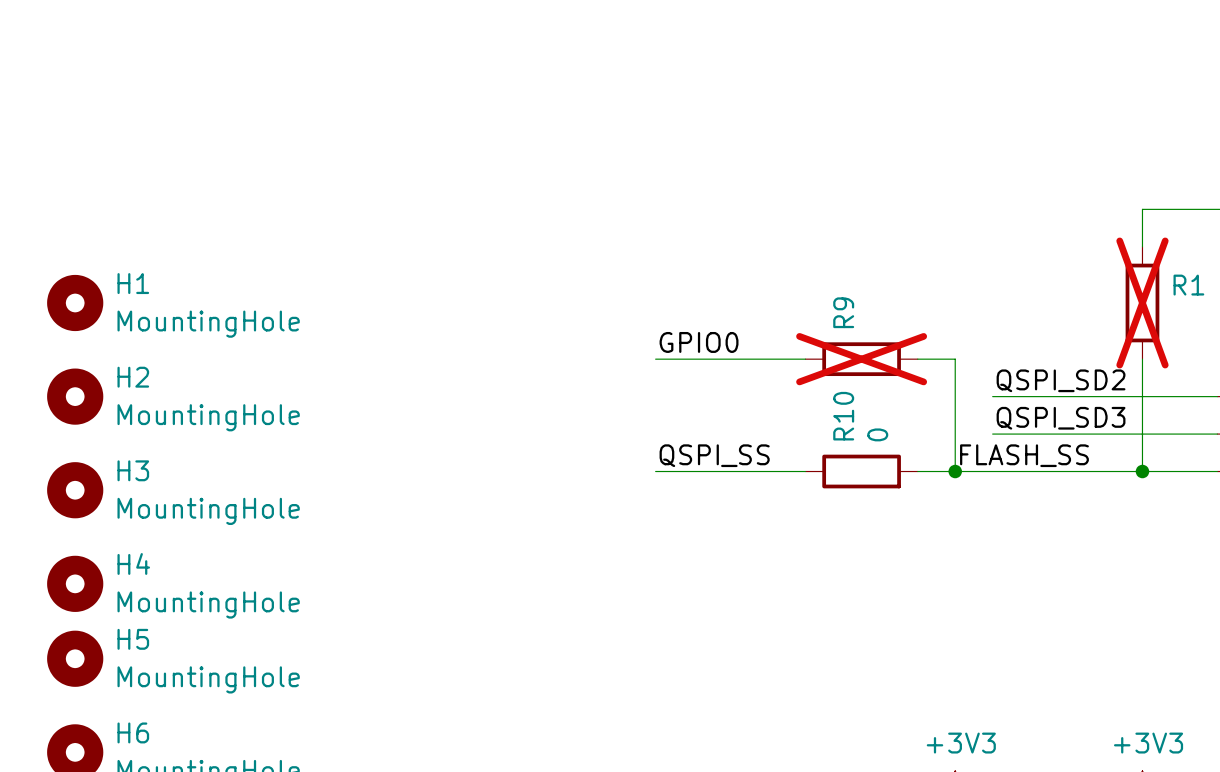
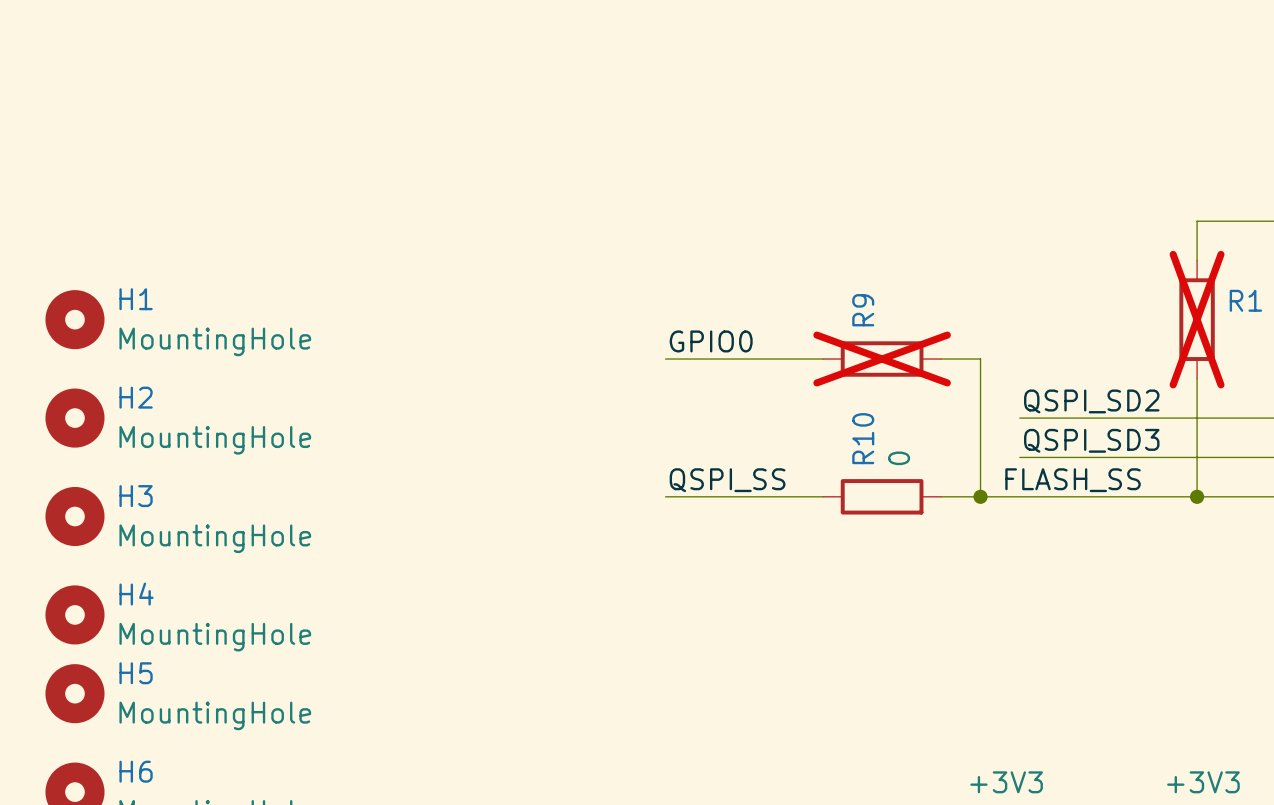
wire: none -> (941, 359) (980, 359) (980, 496)
label position: GPIO0 (699, 342) -> GPIO0 (711, 341)
wire: (655, 359) (805, 359) -> (665, 359) (823, 359)
R9 position: (861, 359) -> (882, 359)
wire: (917, 359) (955, 359) (955, 471) -> none
label position: QSPI_SD2 (1061, 380) -> QSPI_SD2 (1091, 401)
wire: none -> (1019, 418) (1039, 418)
label position: QSPI_SD3 (1061, 418) -> QSPI_SD3 (1091, 440)
wire: none -> (1019, 457) (1039, 457)
label position: QSPI_SS (714, 455) -> QSPI_SS (727, 480)
wire: none -> (665, 496) (685, 496)
R10 position: (861, 471) -> (882, 496)
junction position: (955, 471) -> (980, 496)

